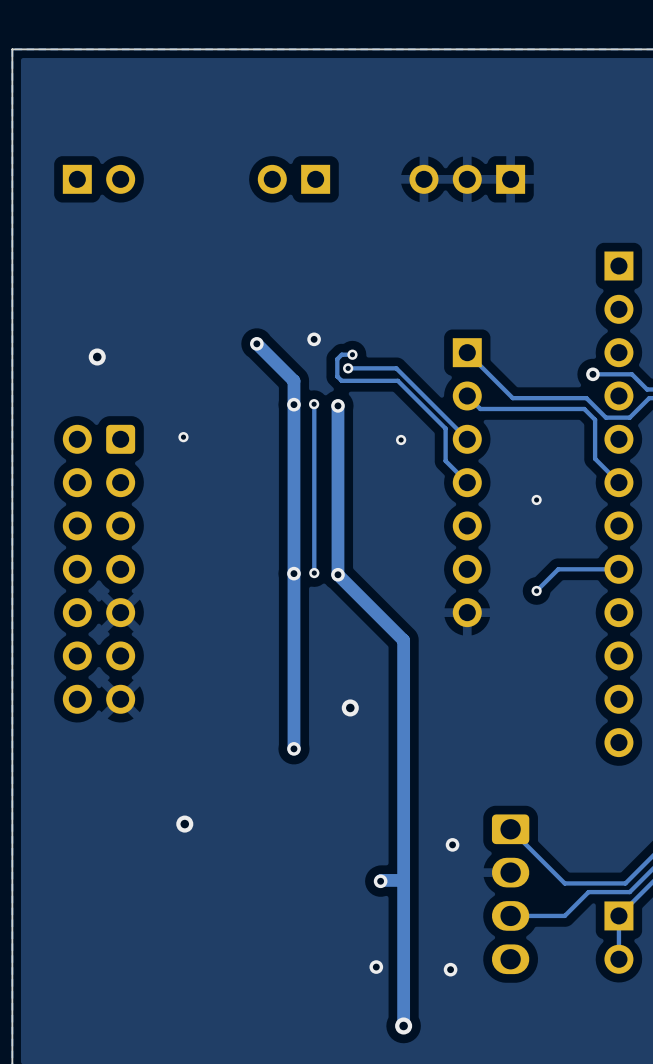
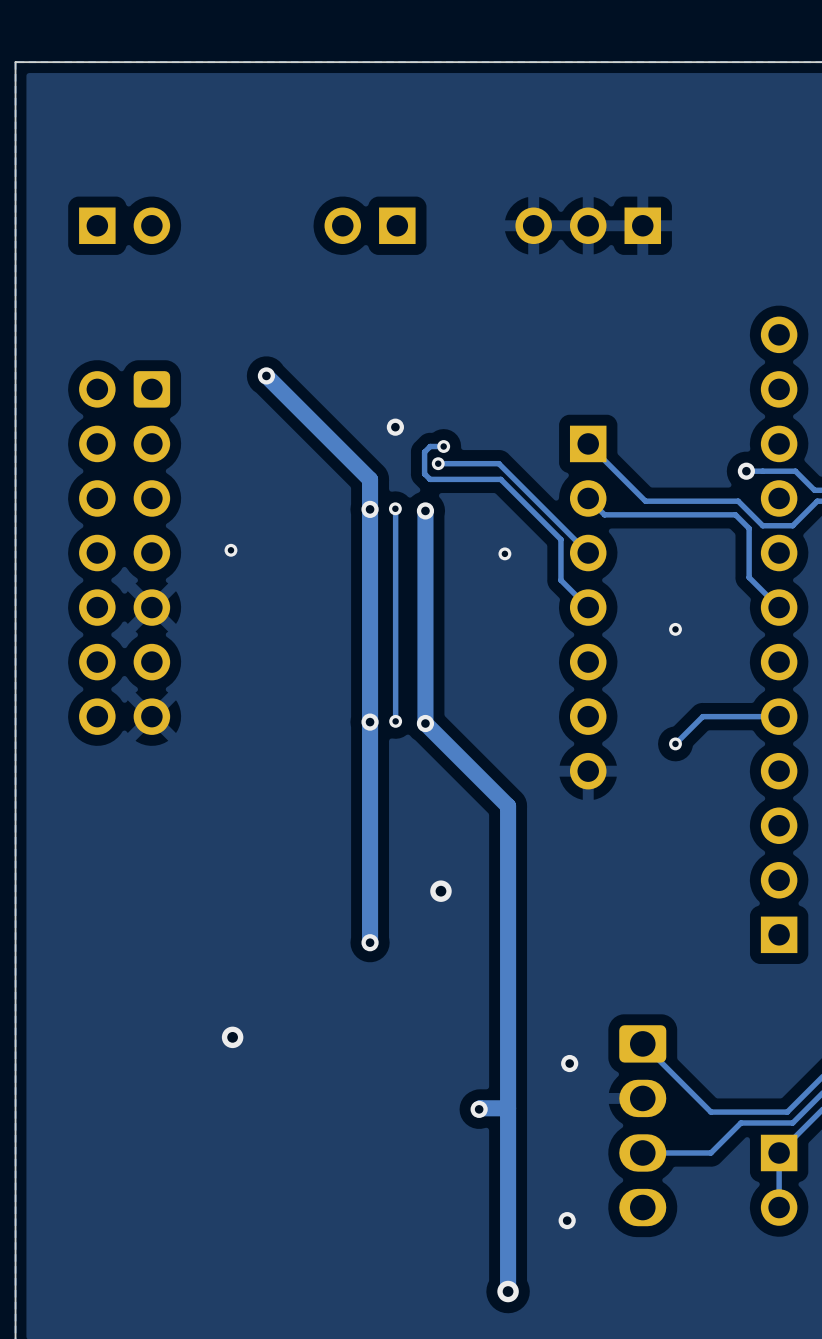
track: none -> (266, 375) (323, 432)
via position: (256, 343) -> (266, 375)
via: (97, 356) -> none
part rotation: 0° (618, 504) -> 180° (779, 634)
part position: (98, 569) -> (124, 553)
via: (376, 967) -> none

